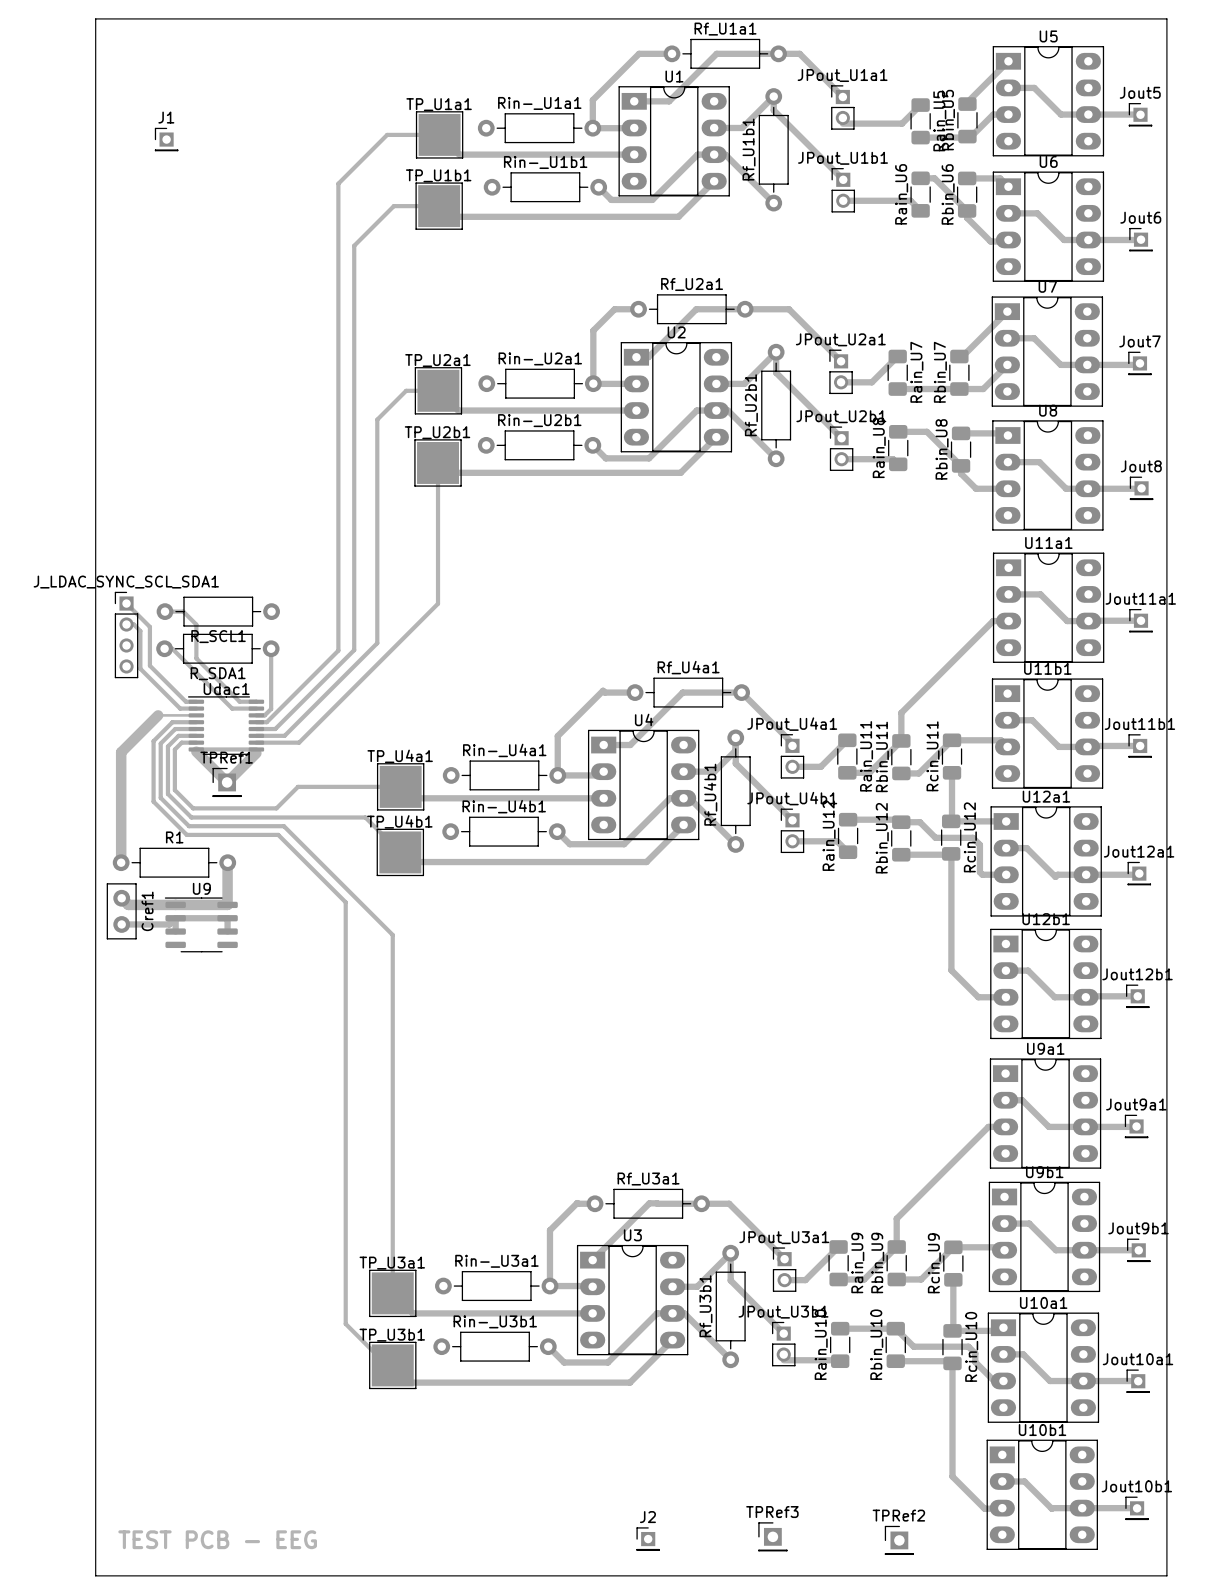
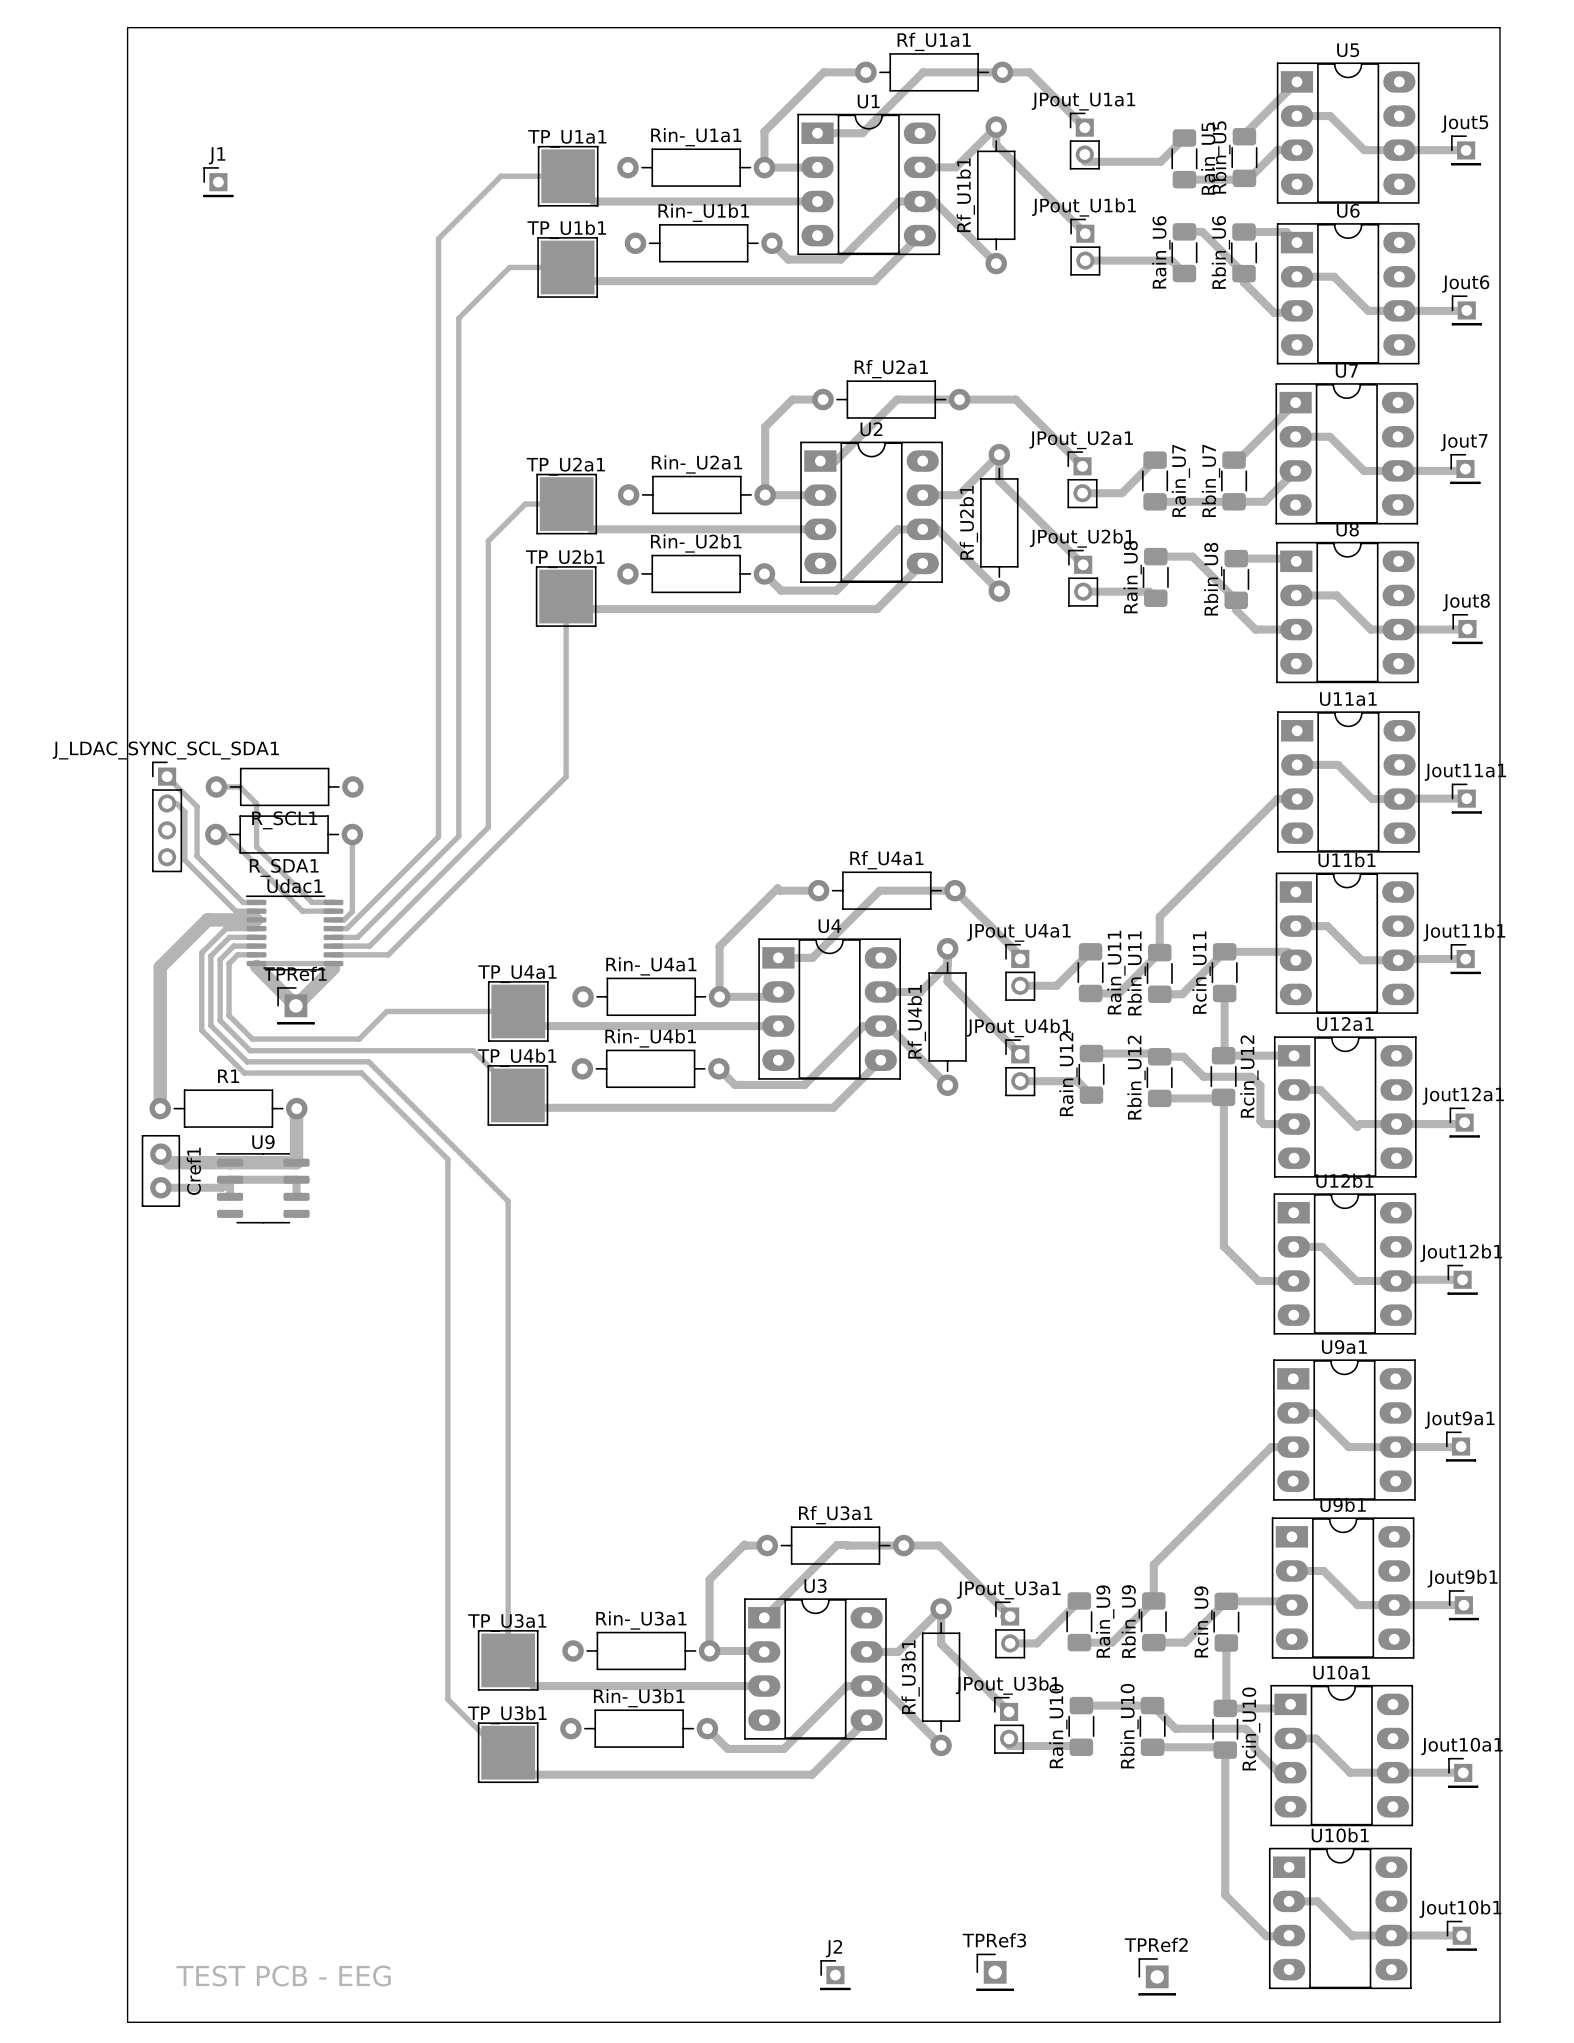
track width: thin (158, 715) (196, 715) -> thick (207, 919) (256, 919)

